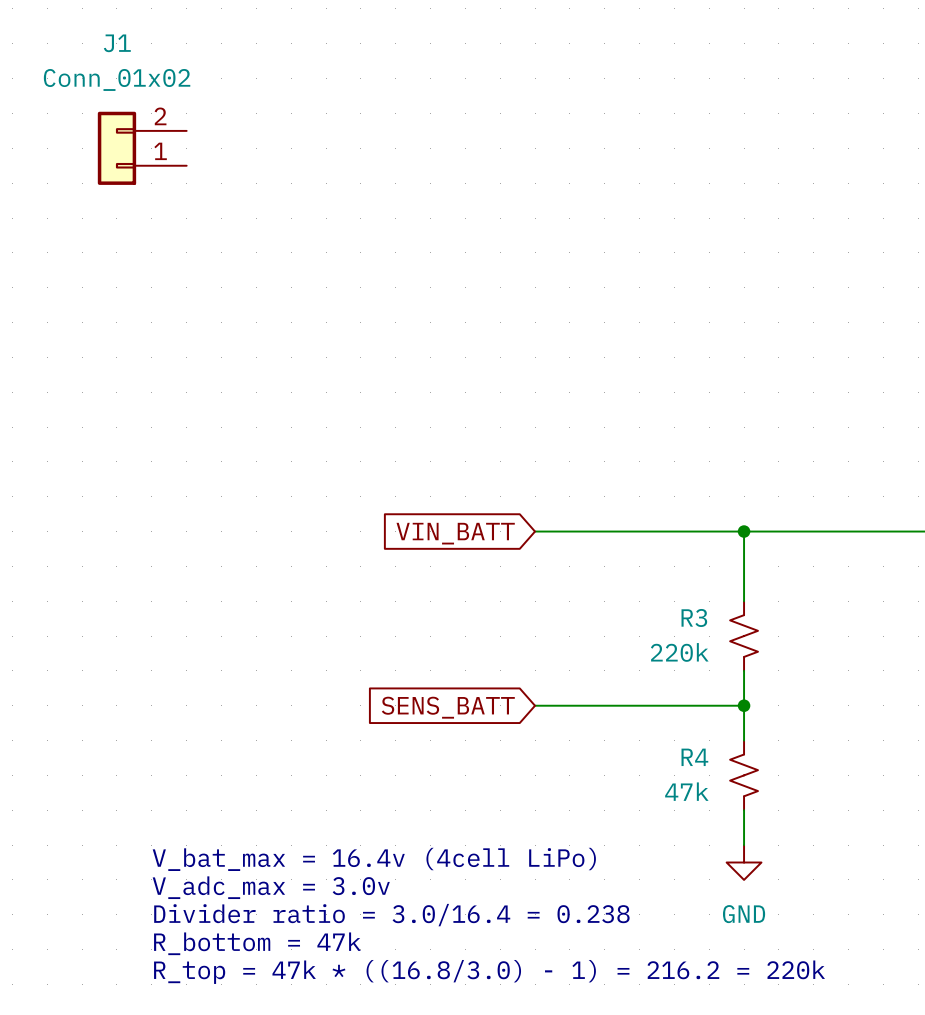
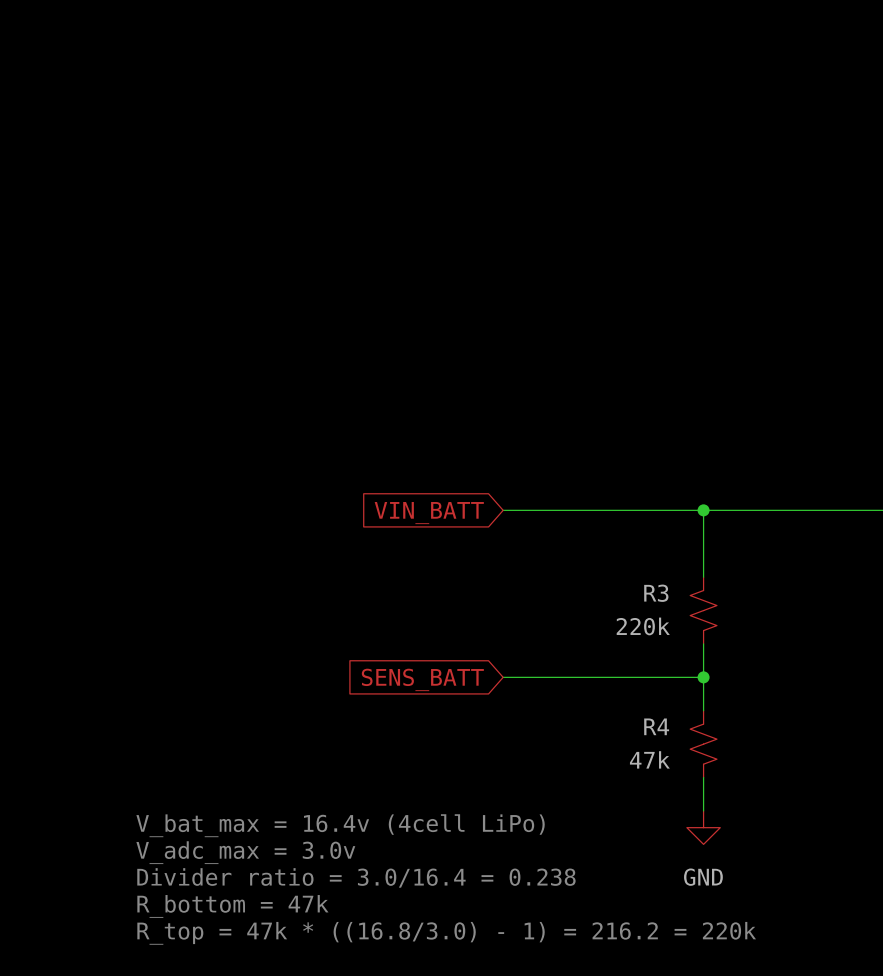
J1: Conn_01x02 (142, 148) -> none

